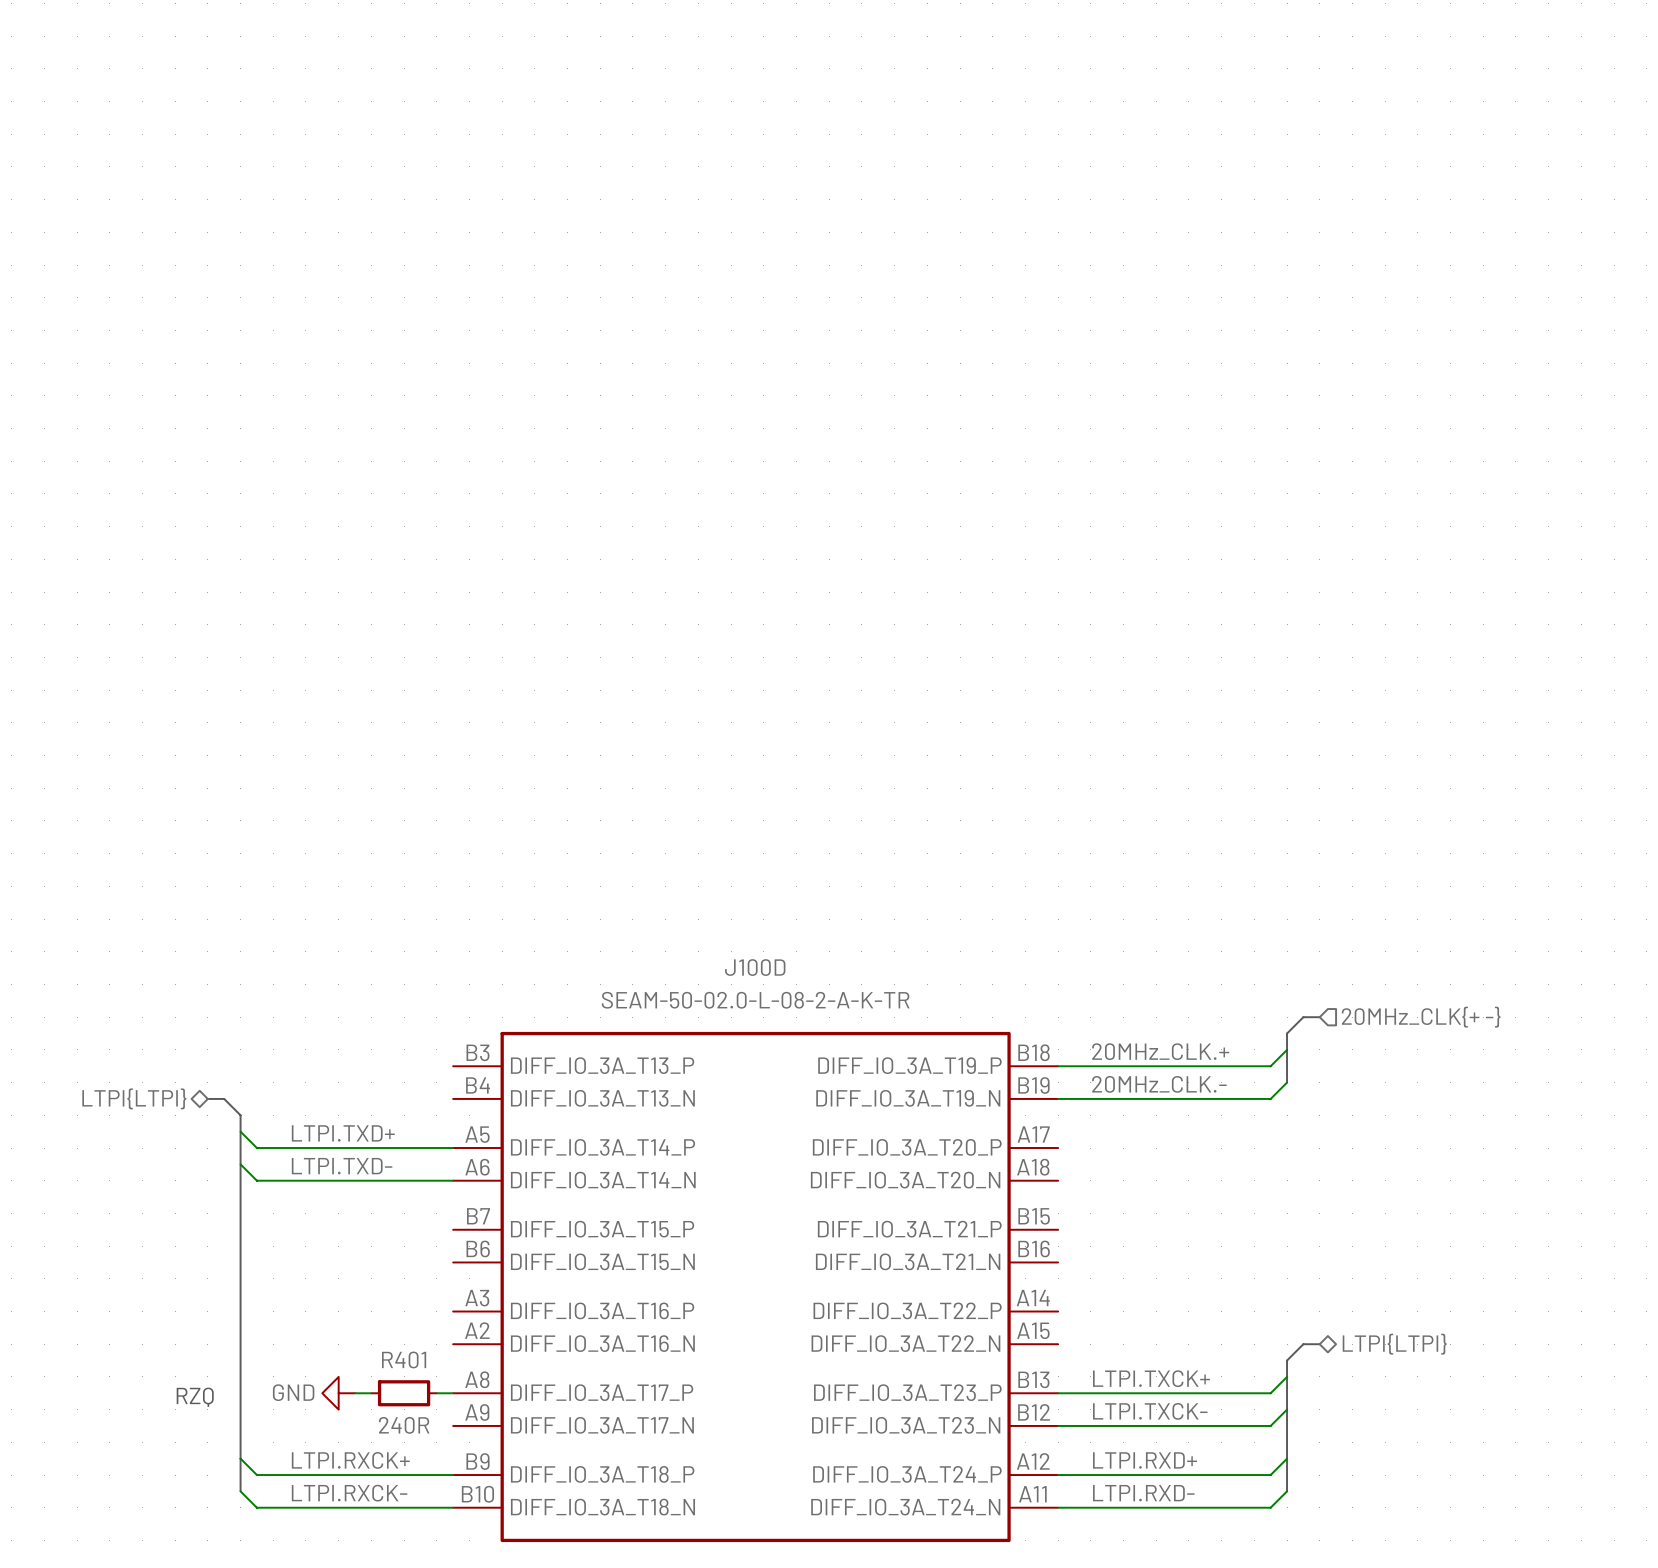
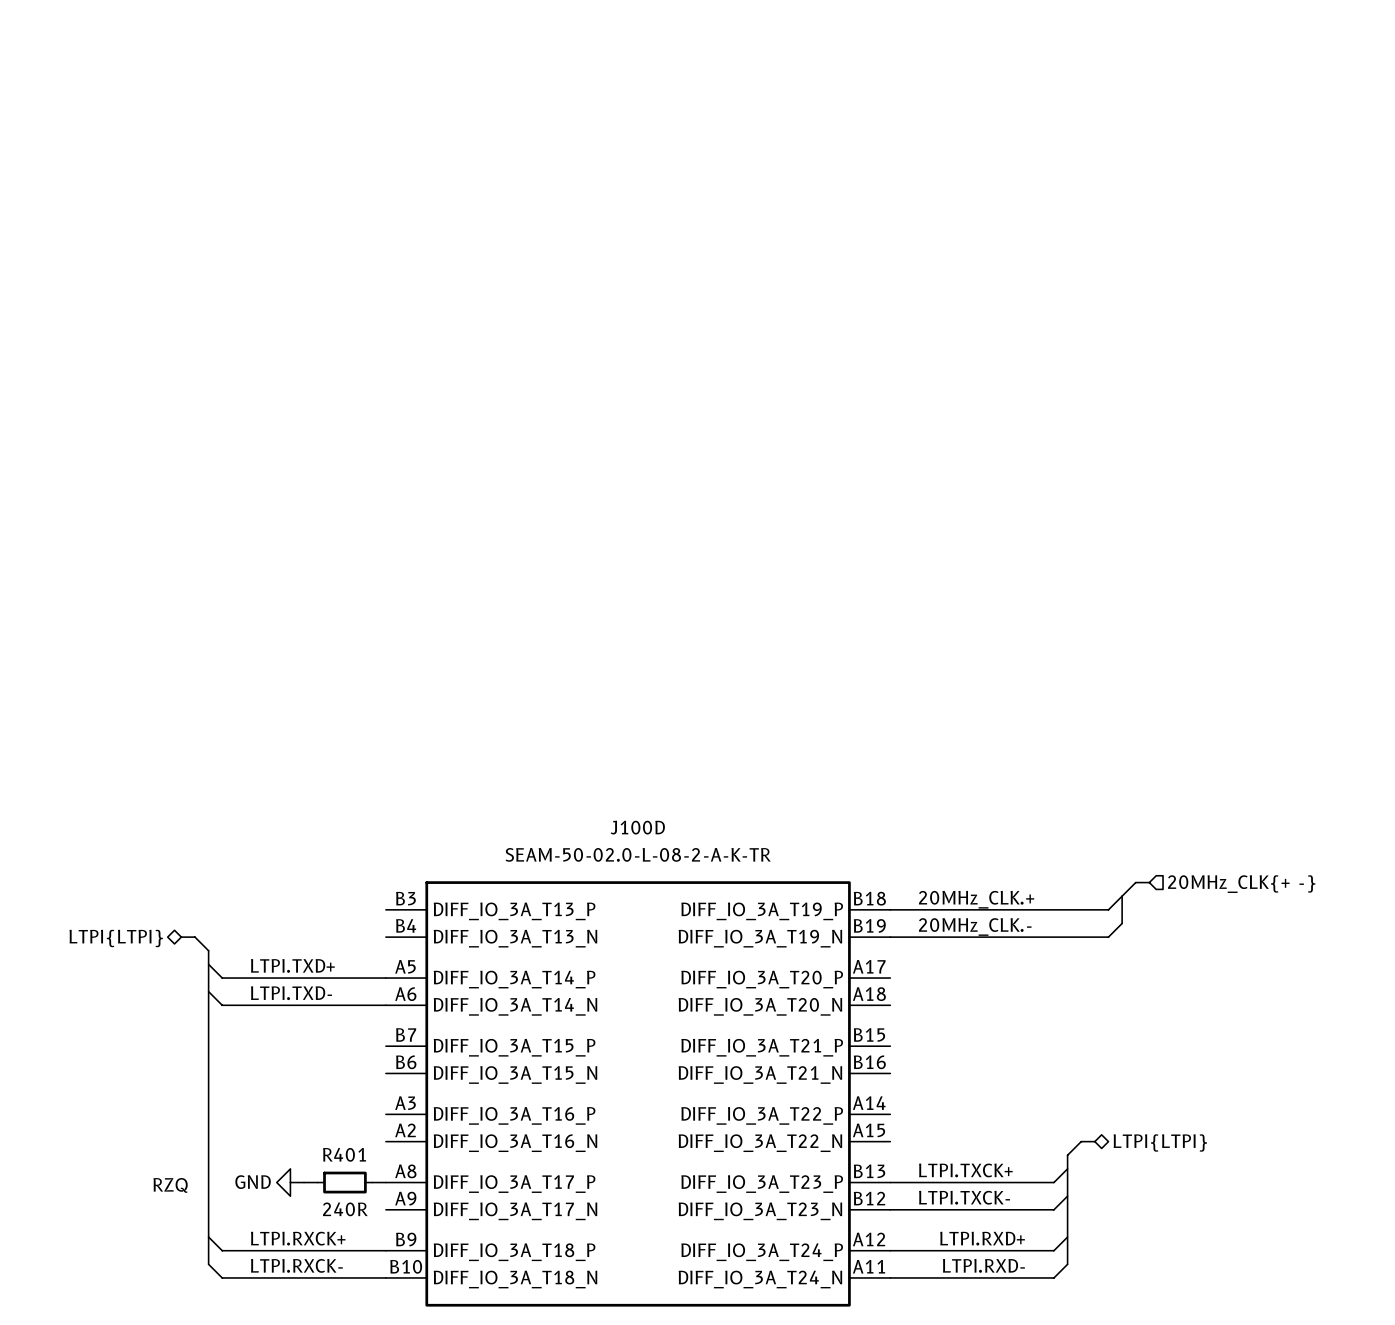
bus: (1319, 1017) (1303, 1017) (1287, 1033) (1287, 1082) -> none
hierarchical label position: 20MHz_CLK{+ -} (1421, 1017) -> 20MHz_CLK{+ -} (1241, 884)
bus: none -> (1149, 882) (1135, 882) (1122, 896) (1122, 923)
wire: (1287, 1049) (1270, 1066) -> (1122, 896) (1108, 909) (1067, 909)
wire: (1287, 1082) (1270, 1098) -> (1122, 923) (1108, 937) (1067, 937)
bus: (1319, 1344) (1303, 1344) (1287, 1360) (1287, 1491) -> (1094, 1141) (1081, 1141) (1067, 1155) (1067, 1264)
hierarchical label position: LTPI{LTPI} (1394, 1344) -> LTPI{LTPI} (1160, 1143)
wire: (1287, 1376) (1270, 1393) (1254, 1393) -> (1067, 1168) (1053, 1182)
wire: (1287, 1409) (1270, 1425) (1254, 1425) -> (1067, 1196) (1053, 1209)
wire: (1287, 1458) (1270, 1475) (1254, 1475) -> (1067, 1237) (1053, 1250)
label position: LTPI.RXD+ (1145, 1460) -> LTPI.RXD+ (982, 1238)
wire: (1287, 1491) (1270, 1507) (1254, 1507) -> (1067, 1264) (1053, 1277)
label position: LTPI.RXD- (1143, 1493) -> LTPI.RXD- (983, 1265)

